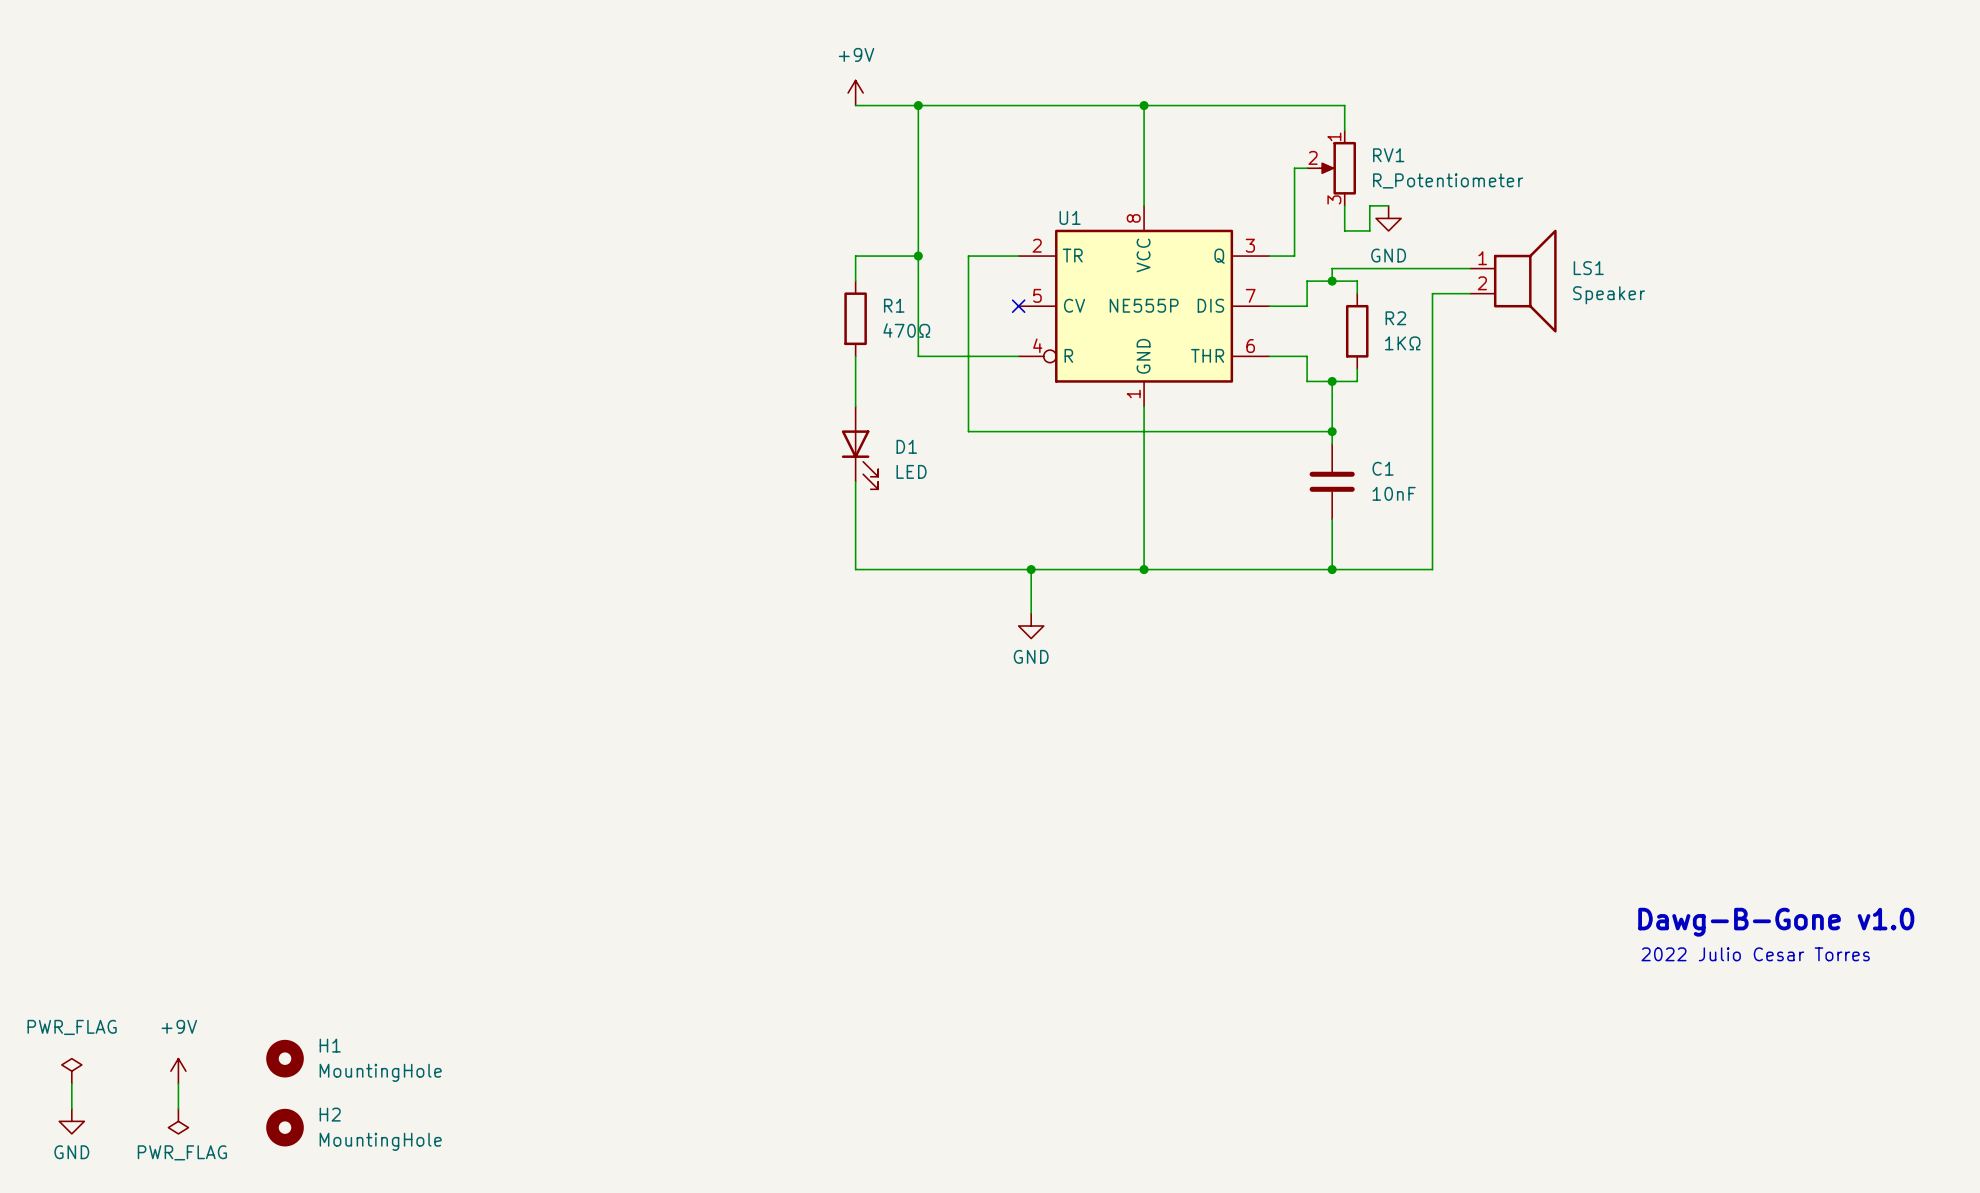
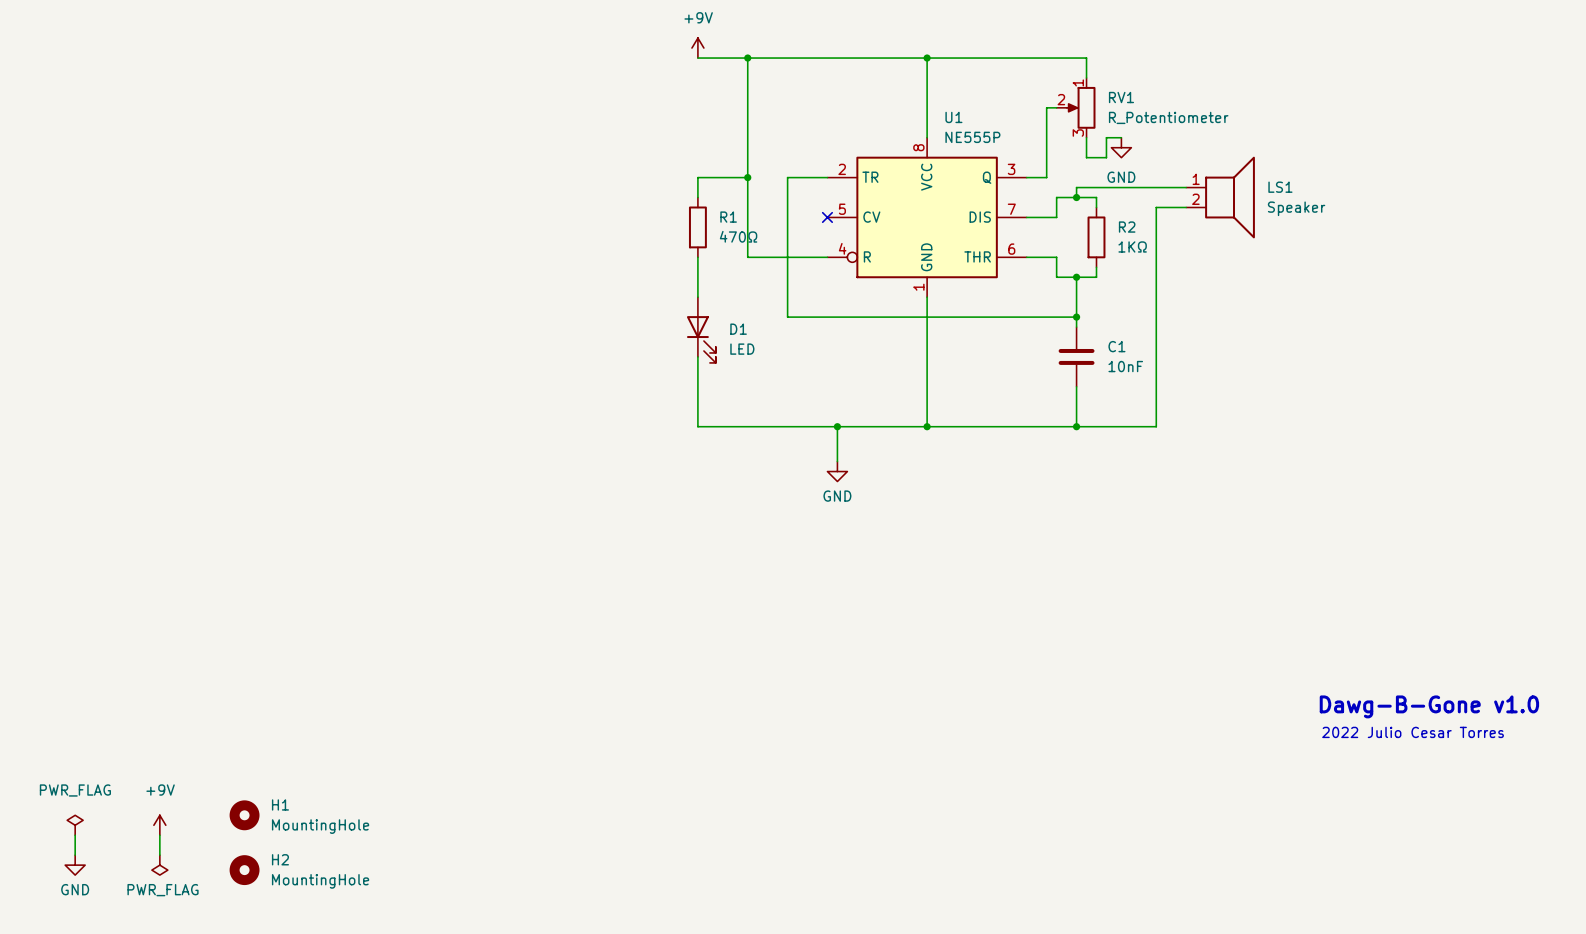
U1 name position: U1 (1070, 217) -> U1 (953, 117)
U1 value position: NE555P (1144, 305) -> NE555P (972, 137)

